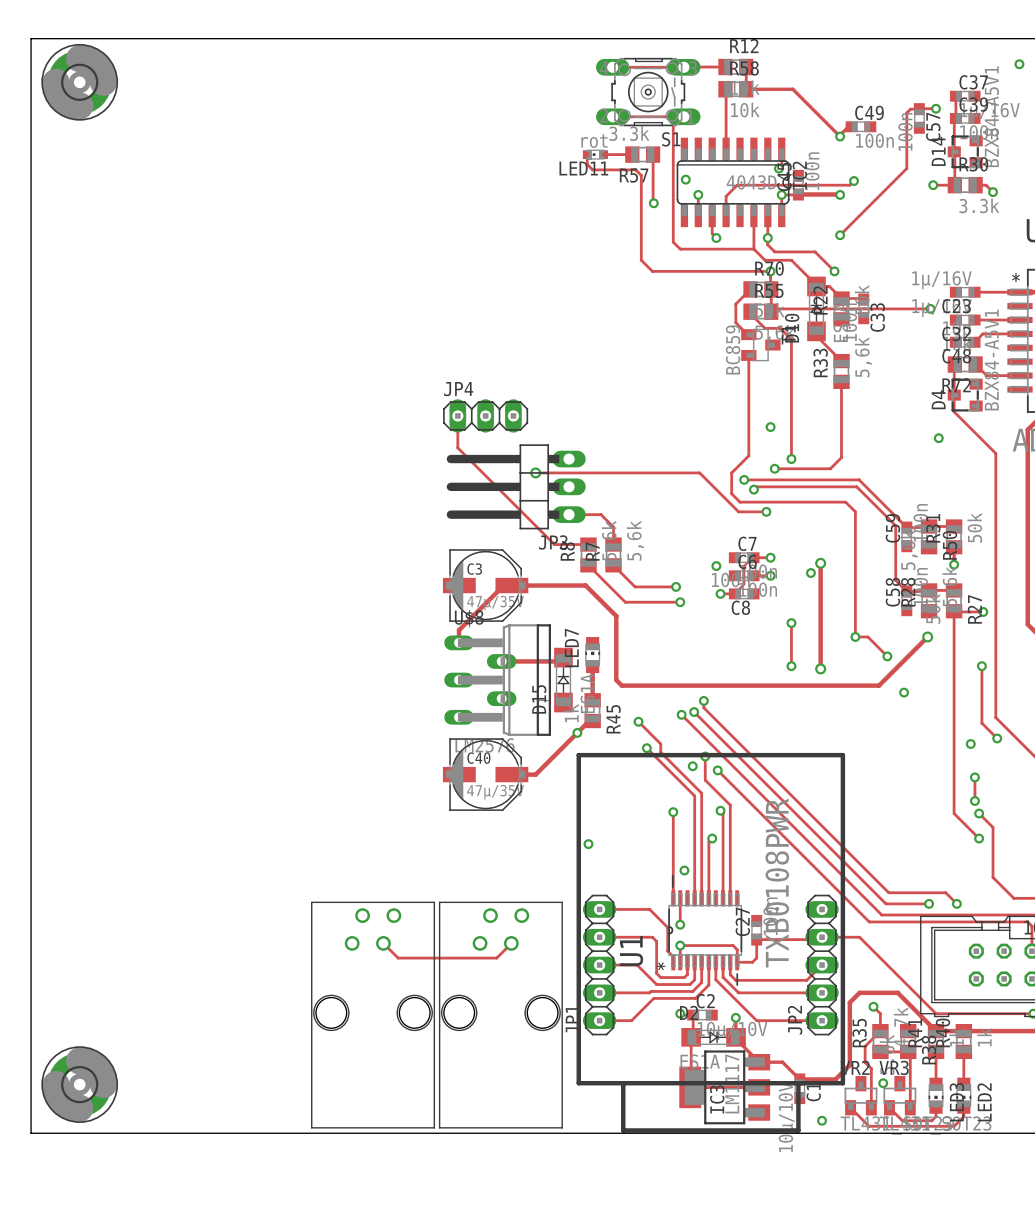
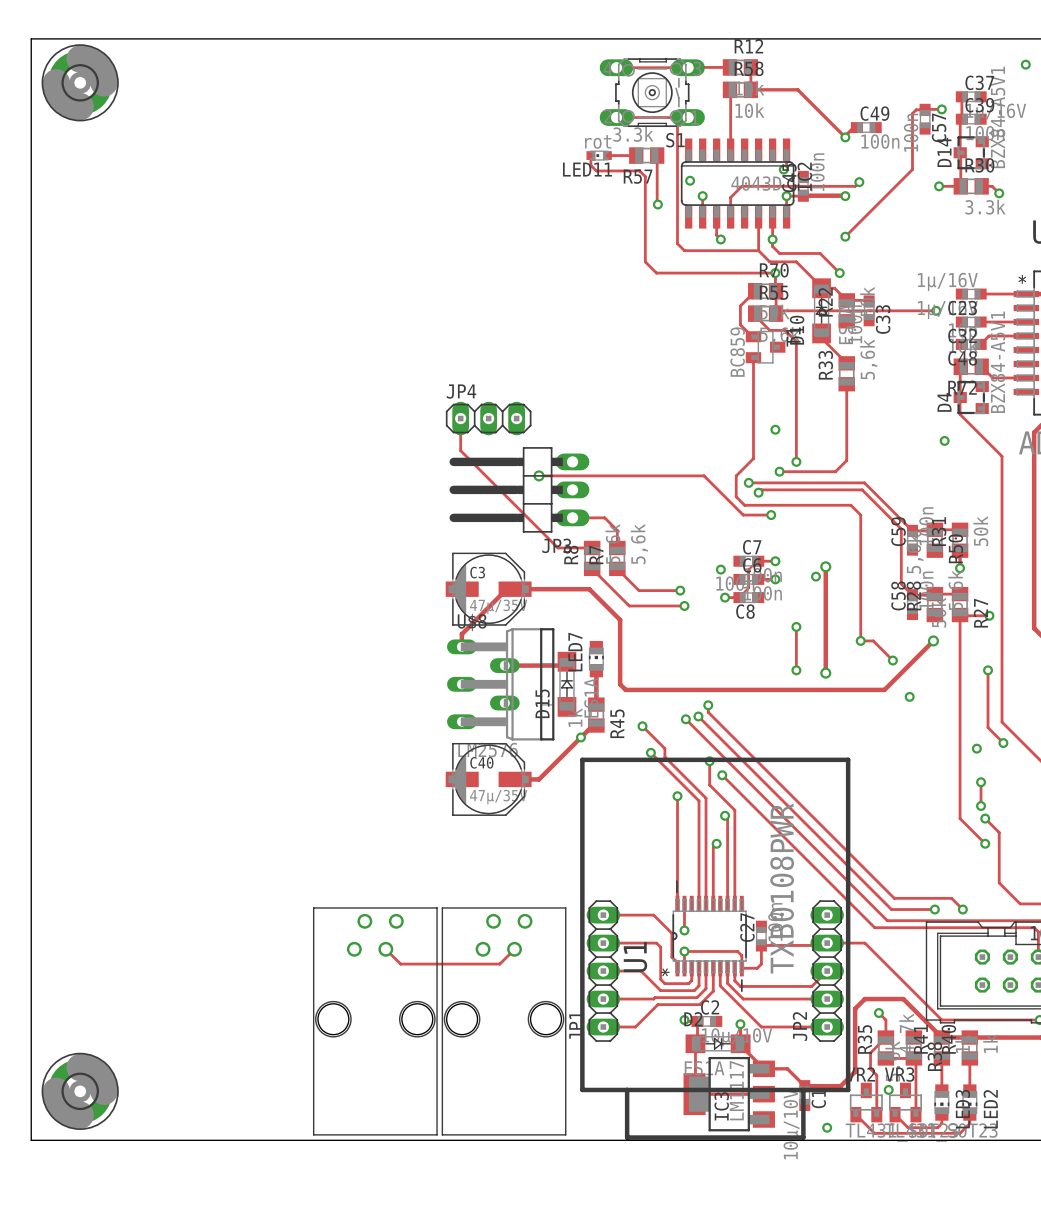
via: (692, 766) -> none
track: none -> (677, 796) (677, 817)
via: none -> (677, 796)
via: (673, 812) -> none
via: (588, 844) -> none
via: (684, 870) -> none

